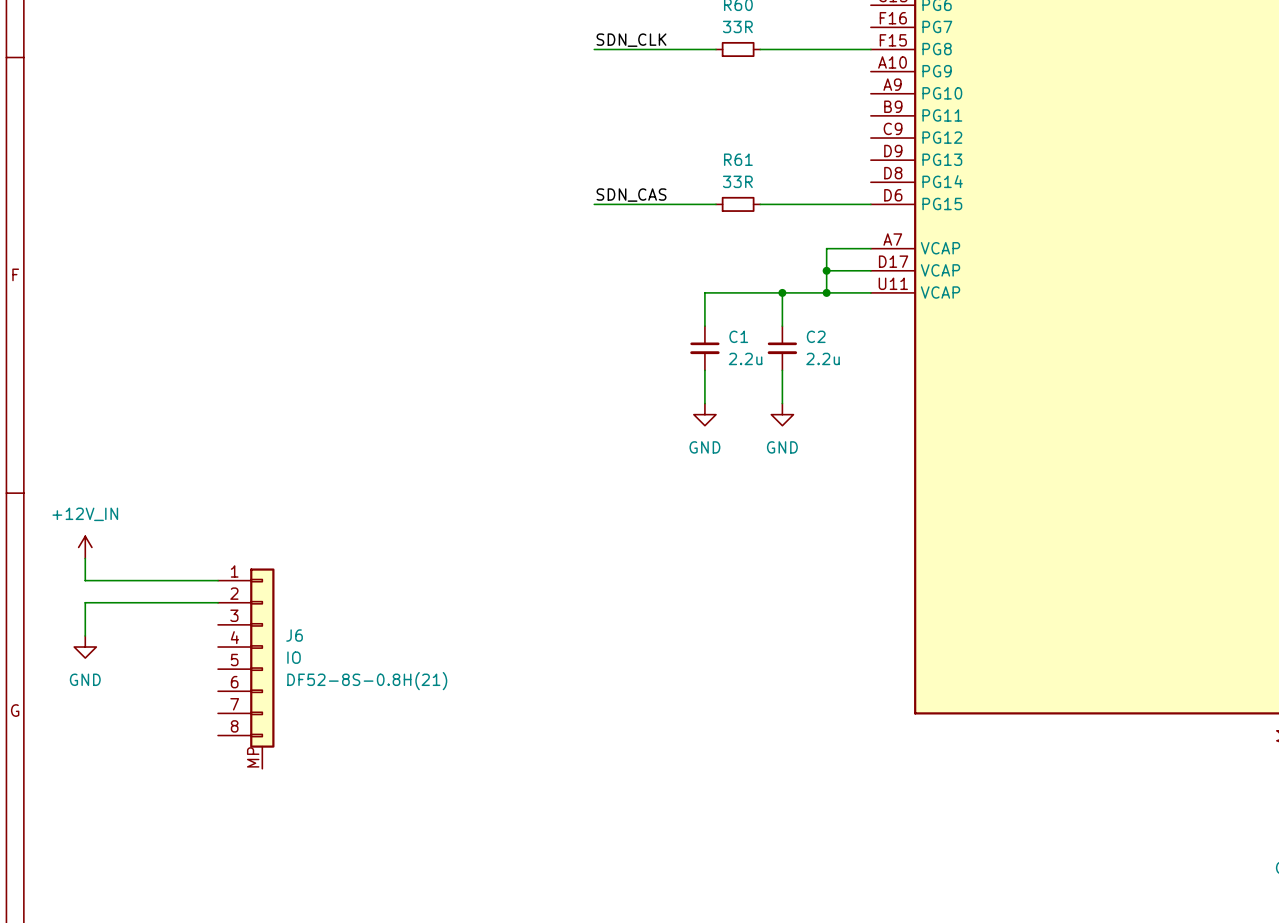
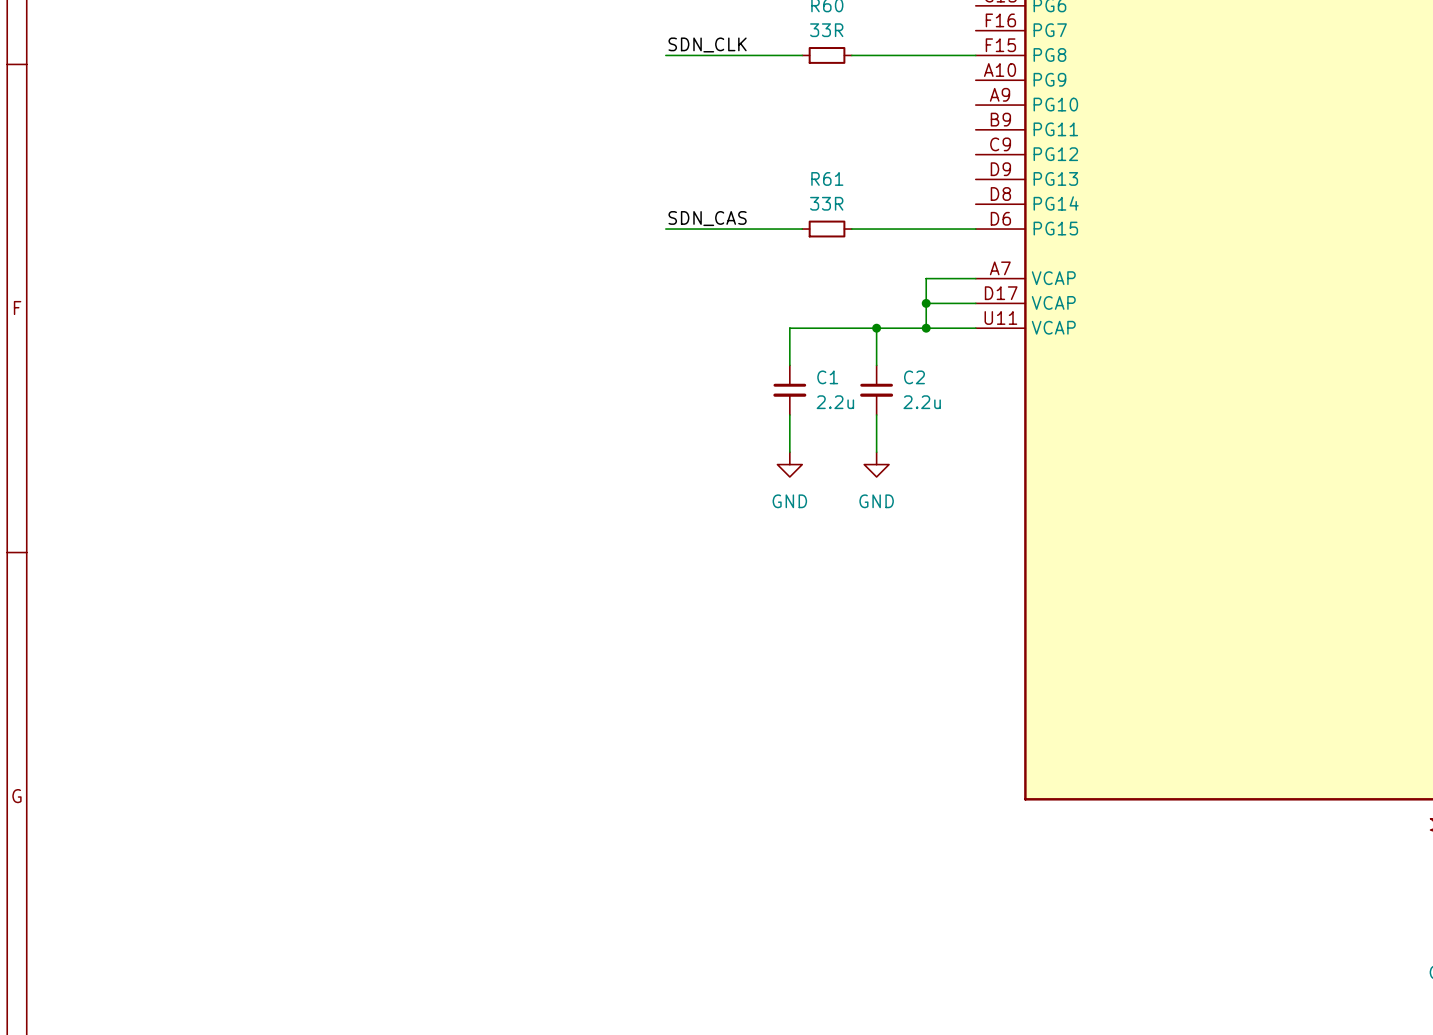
power symbol: +12V_IN (85, 547) -> none
wire: (85, 558) (85, 580) (218, 580) -> none
wire: (218, 602) (85, 602) (85, 635) -> none
power symbol: GND (85, 647) -> none
J6: IO (246, 668) -> none

